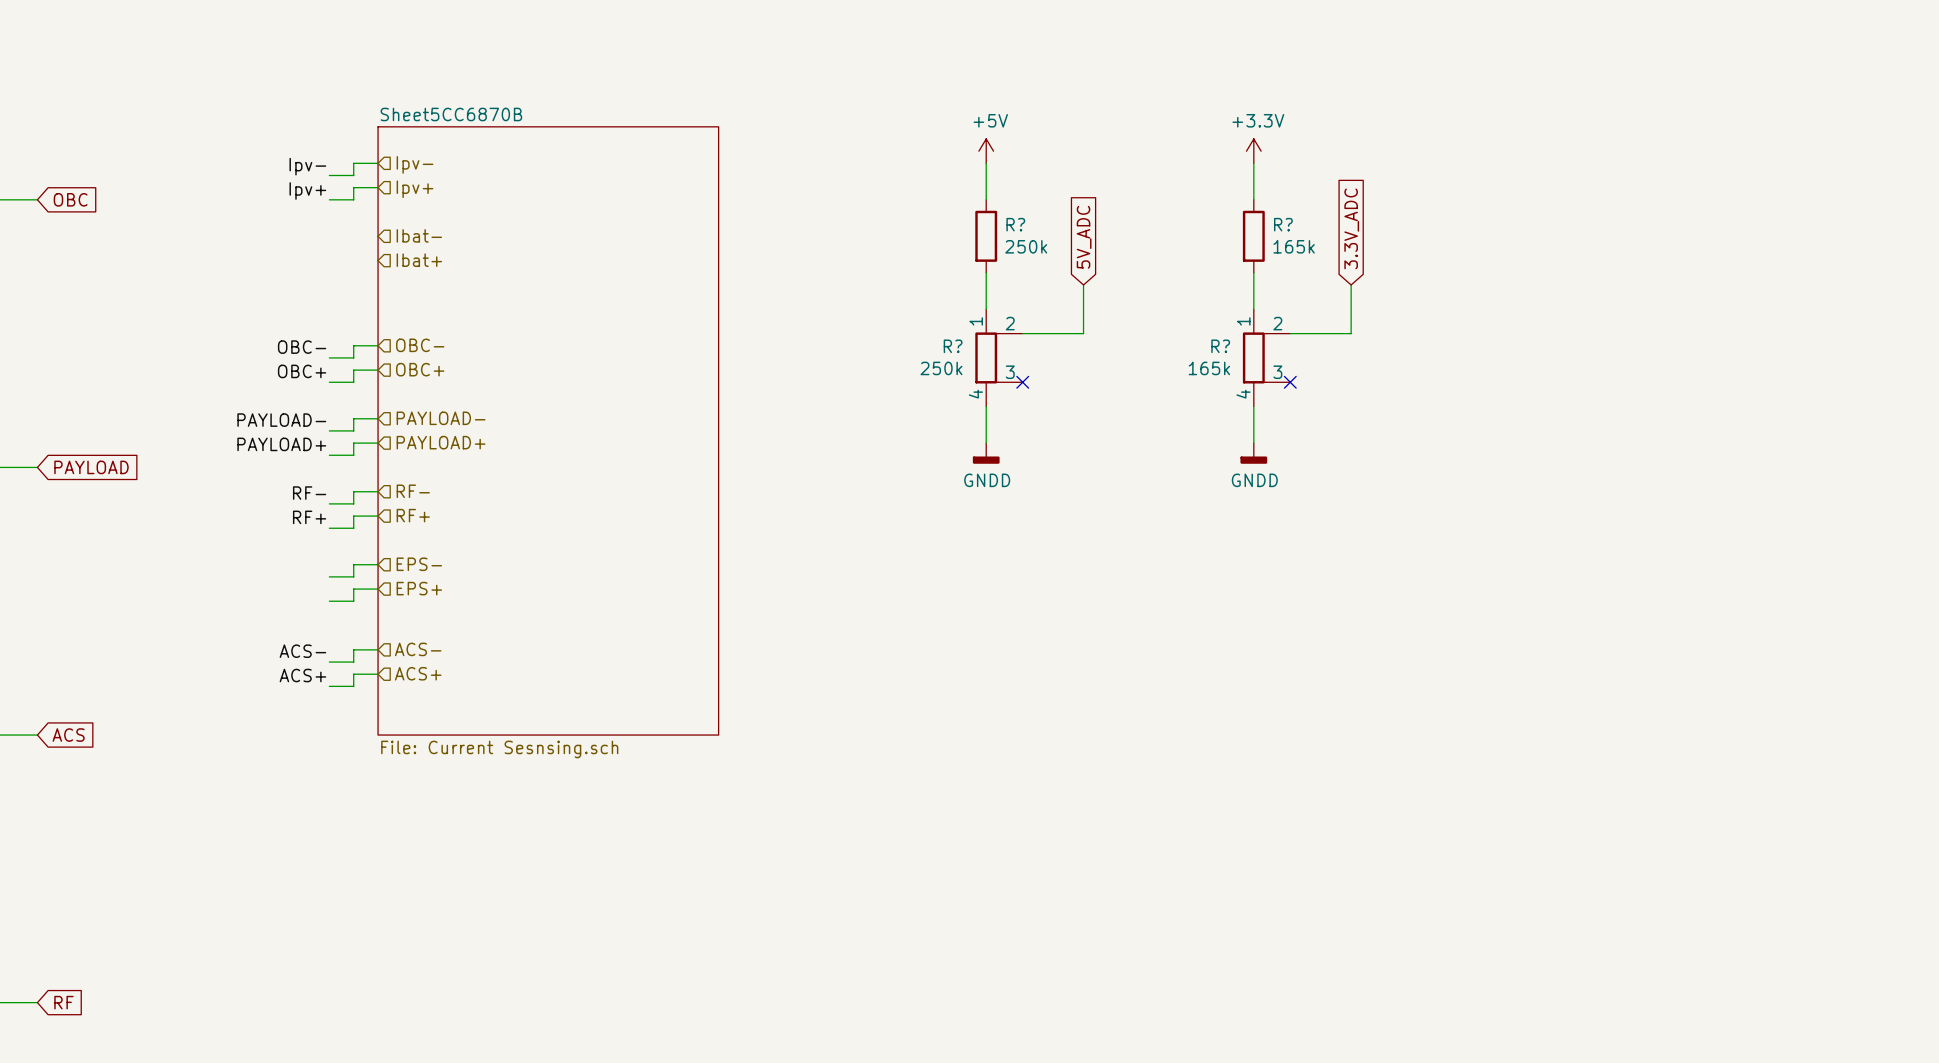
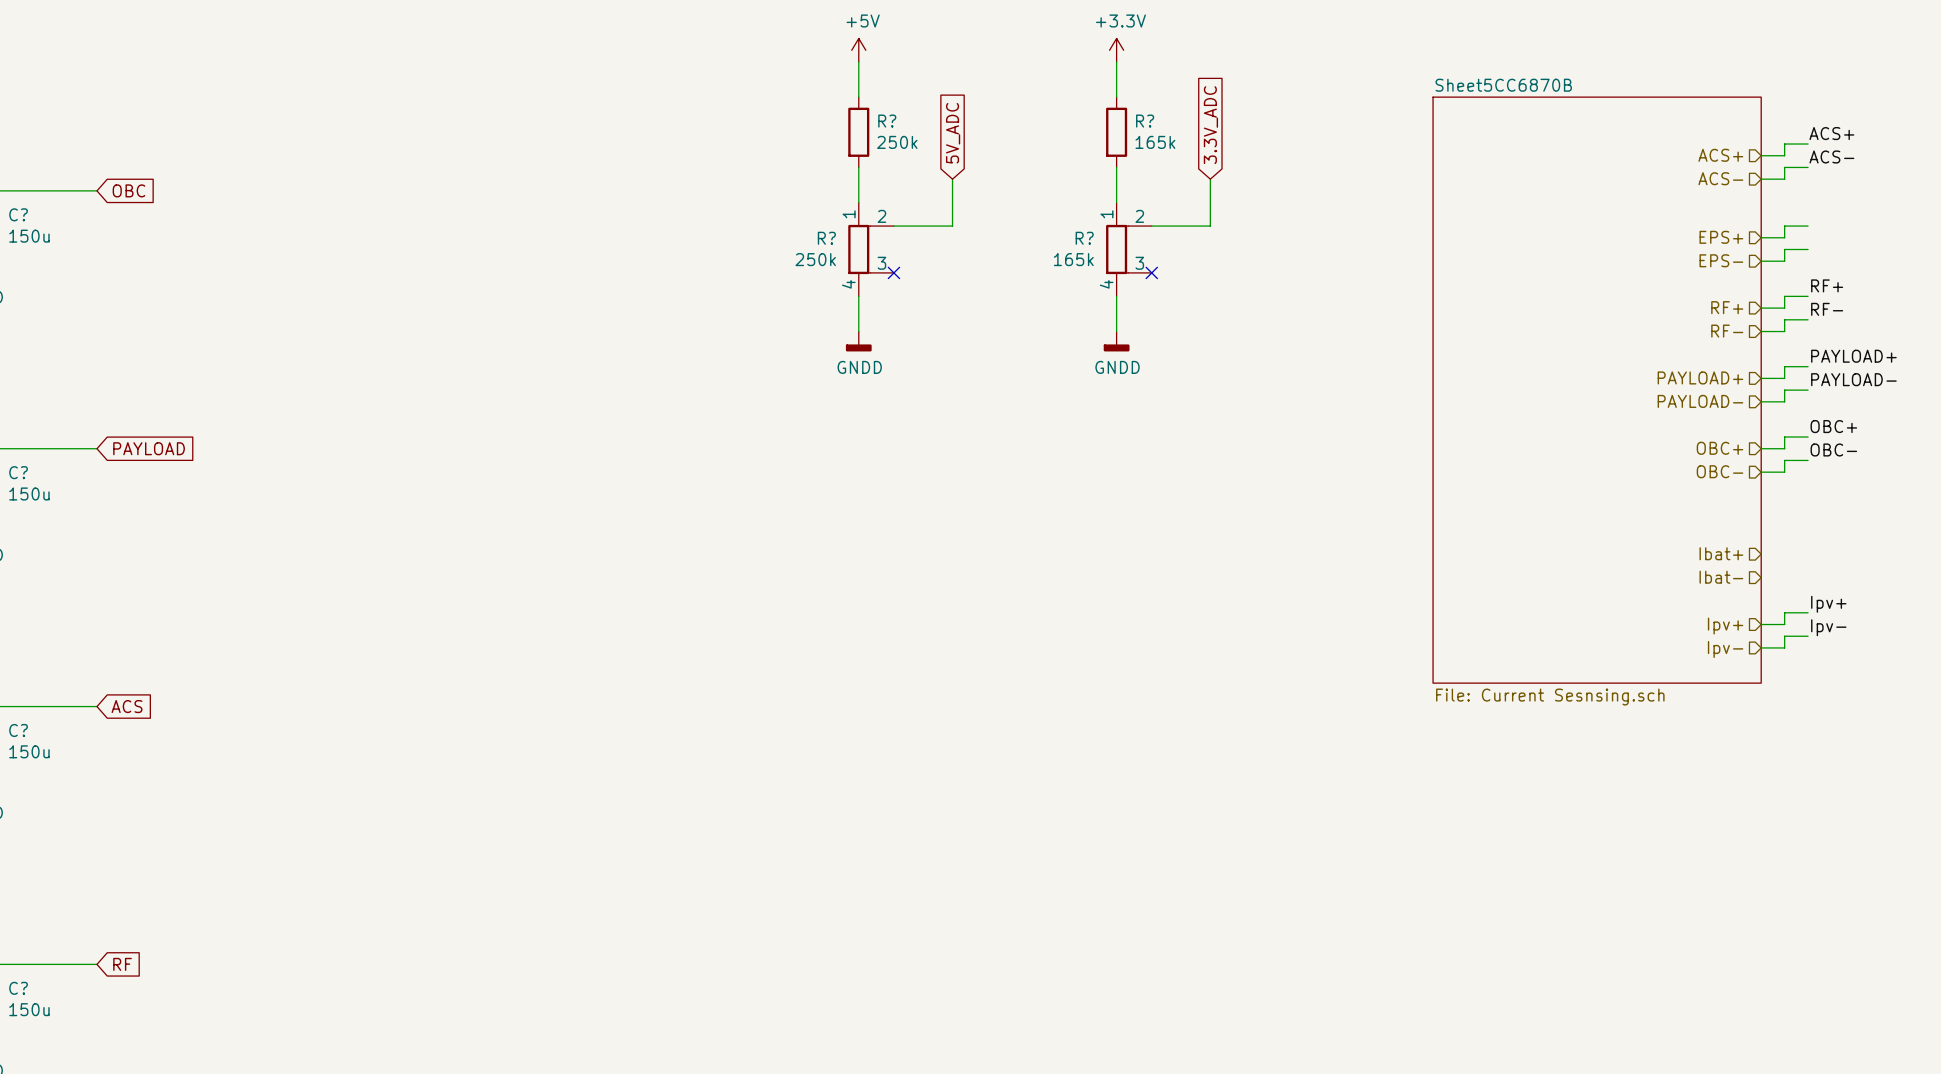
label: none -> ACS+ (1831, 133)
power symbol position: +5V (986, 151) -> +5V (858, 50)
power symbol position: +3.3V (1253, 151) -> +3.3V (1116, 50)
wire: none -> (1808, 144) (1784, 144) (1784, 155) (1761, 155)
hierarchical label: none -> ACS+ (1720, 155)
wire: (378, 163) (353, 163) (353, 175) (329, 175) -> none
wire: (986, 163) (986, 199) -> (858, 61) (858, 97)
wire: (1253, 163) (1253, 199) -> (1116, 61) (1116, 97)
hierarchical label: Ipv- (415, 164) -> none
label: none -> ACS- (1831, 156)
label: Ipv- (307, 166) -> none
wire: none -> (1808, 167) (1784, 167) (1784, 179) (1761, 179)
wire: (378, 187) (353, 187) (353, 199) (329, 199) -> none
hierarchical label: none -> ACS- (1720, 178)
hierarchical label: Ipv+ (415, 189) -> none
label: Ipv+ (307, 190) -> none
global label position: 3.3V_ADC (1351, 228) -> 3.3V_ADC (1210, 125)
hierarchical label: Ibat- (419, 235) -> none
R? position: (986, 236) -> (858, 132)
R? position: (1253, 236) -> (1116, 132)
wire: none -> (1808, 226) (1784, 226) (1784, 237) (1761, 237)
global label position: 5V_ADC (1084, 237) -> 5V_ADC (953, 133)
hierarchical label: none -> EPS+ (1721, 237)
hierarchical label: Ibat+ (419, 260) -> none
wire: none -> (1808, 249) (1784, 249) (1784, 261) (1761, 261)
wire: (986, 272) (986, 309) -> (858, 167) (858, 202)
wire: (1253, 272) (1253, 309) -> (1116, 167) (1116, 202)
hierarchical label: none -> EPS- (1721, 260)
no-connect mark: none -> (893, 272)
wire: (1083, 284) (1083, 333) (1022, 333) -> (952, 179) (952, 226) (893, 226)
no-connect mark: none -> (1151, 272)
wire: (1351, 284) (1351, 333) (1290, 333) -> (1210, 179) (1210, 226) (1151, 226)
label: none -> RF+ (1827, 285)
wire: none -> (1808, 296) (1784, 296) (1784, 308) (1761, 308)
hierarchical label: none -> RF+ (1727, 307)
label: none -> RF- (1827, 309)
wire: none -> (1808, 319) (1784, 319) (1784, 331) (1761, 331)
wire: (378, 345) (353, 345) (353, 357) (329, 357) -> none
hierarchical label: OBC- (420, 345) -> none
hierarchical label: none -> RF- (1727, 331)
label: OBC- (302, 347) -> none
power symbol: none -> GNDD (858, 341)
power symbol: none -> GNDD (1116, 341)
R? position: (998, 357) -> (871, 249)
R? position: (1266, 357) -> (1128, 249)
hierarchical label: OBC+ (420, 369) -> none
wire: (378, 370) (353, 370) (353, 382) (329, 382) -> none
label: OBC+ (302, 371) -> none
label: none -> PAYLOAD+ (1853, 356)
no-connect mark: (1022, 382) -> none
no-connect mark: (1290, 382) -> none
wire: none -> (1808, 366) (1784, 366) (1784, 378) (1761, 378)
hierarchical label: none -> PAYLOAD+ (1700, 377)
label: none -> PAYLOAD- (1853, 379)
wire: (986, 406) (986, 443) -> (858, 296) (858, 331)
wire: (1253, 406) (1253, 443) -> (1116, 296) (1116, 331)
wire: none -> (1808, 390) (1784, 390) (1784, 401) (1761, 401)
wire: (378, 418) (353, 418) (353, 430) (329, 430) -> none
hierarchical label: PAYLOAD- (441, 418) -> none
hierarchical label: none -> PAYLOAD- (1700, 401)
label: PAYLOAD- (281, 420) -> none
sheet Sheet5CC6870B position: (548, 430) -> (1597, 390)
hierarchical label: PAYLOAD+ (441, 442) -> none
wire: (378, 443) (353, 443) (353, 455) (329, 455) -> none
label: PAYLOAD+ (281, 444) -> none
label: none -> OBC+ (1833, 426)
power symbol: GNDD (986, 453) -> none
power symbol: GNDD (1253, 453) -> none
wire: none -> (1808, 437) (1784, 437) (1784, 448) (1761, 448)
hierarchical label: none -> OBC+ (1719, 448)
label: none -> OBC- (1833, 449)
wire: none -> (1808, 460) (1784, 460) (1784, 472) (1761, 472)
wire: (378, 491) (353, 491) (353, 503) (329, 503) -> none
hierarchical label: RF- (413, 491) -> none
hierarchical label: none -> OBC- (1719, 471)
label: RF- (309, 493) -> none
hierarchical label: RF+ (413, 515) -> none
wire: (378, 516) (353, 516) (353, 528) (329, 528) -> none
label: RF+ (309, 517) -> none
wire: (378, 564) (353, 564) (353, 576) (329, 576) -> none
hierarchical label: EPS- (419, 564) -> none
hierarchical label: none -> Ibat+ (1721, 553)
hierarchical label: EPS+ (419, 588) -> none
wire: (378, 589) (353, 589) (353, 601) (329, 601) -> none
hierarchical label: none -> Ibat- (1721, 577)
label: none -> Ipv+ (1828, 604)
wire: none -> (1808, 612) (1784, 612) (1784, 624) (1761, 624)
wire: (378, 649) (353, 649) (353, 662) (329, 662) -> none
hierarchical label: ACS- (418, 649) -> none
label: ACS- (302, 651) -> none
hierarchical label: none -> Ipv+ (1725, 626)
label: none -> Ipv- (1828, 627)
wire: none -> (1808, 636) (1784, 636) (1784, 647) (1761, 647)
hierarchical label: ACS+ (418, 673) -> none
wire: (378, 674) (353, 674) (353, 686) (329, 686) -> none
label: ACS+ (302, 675) -> none
hierarchical label: none -> Ipv- (1725, 649)

